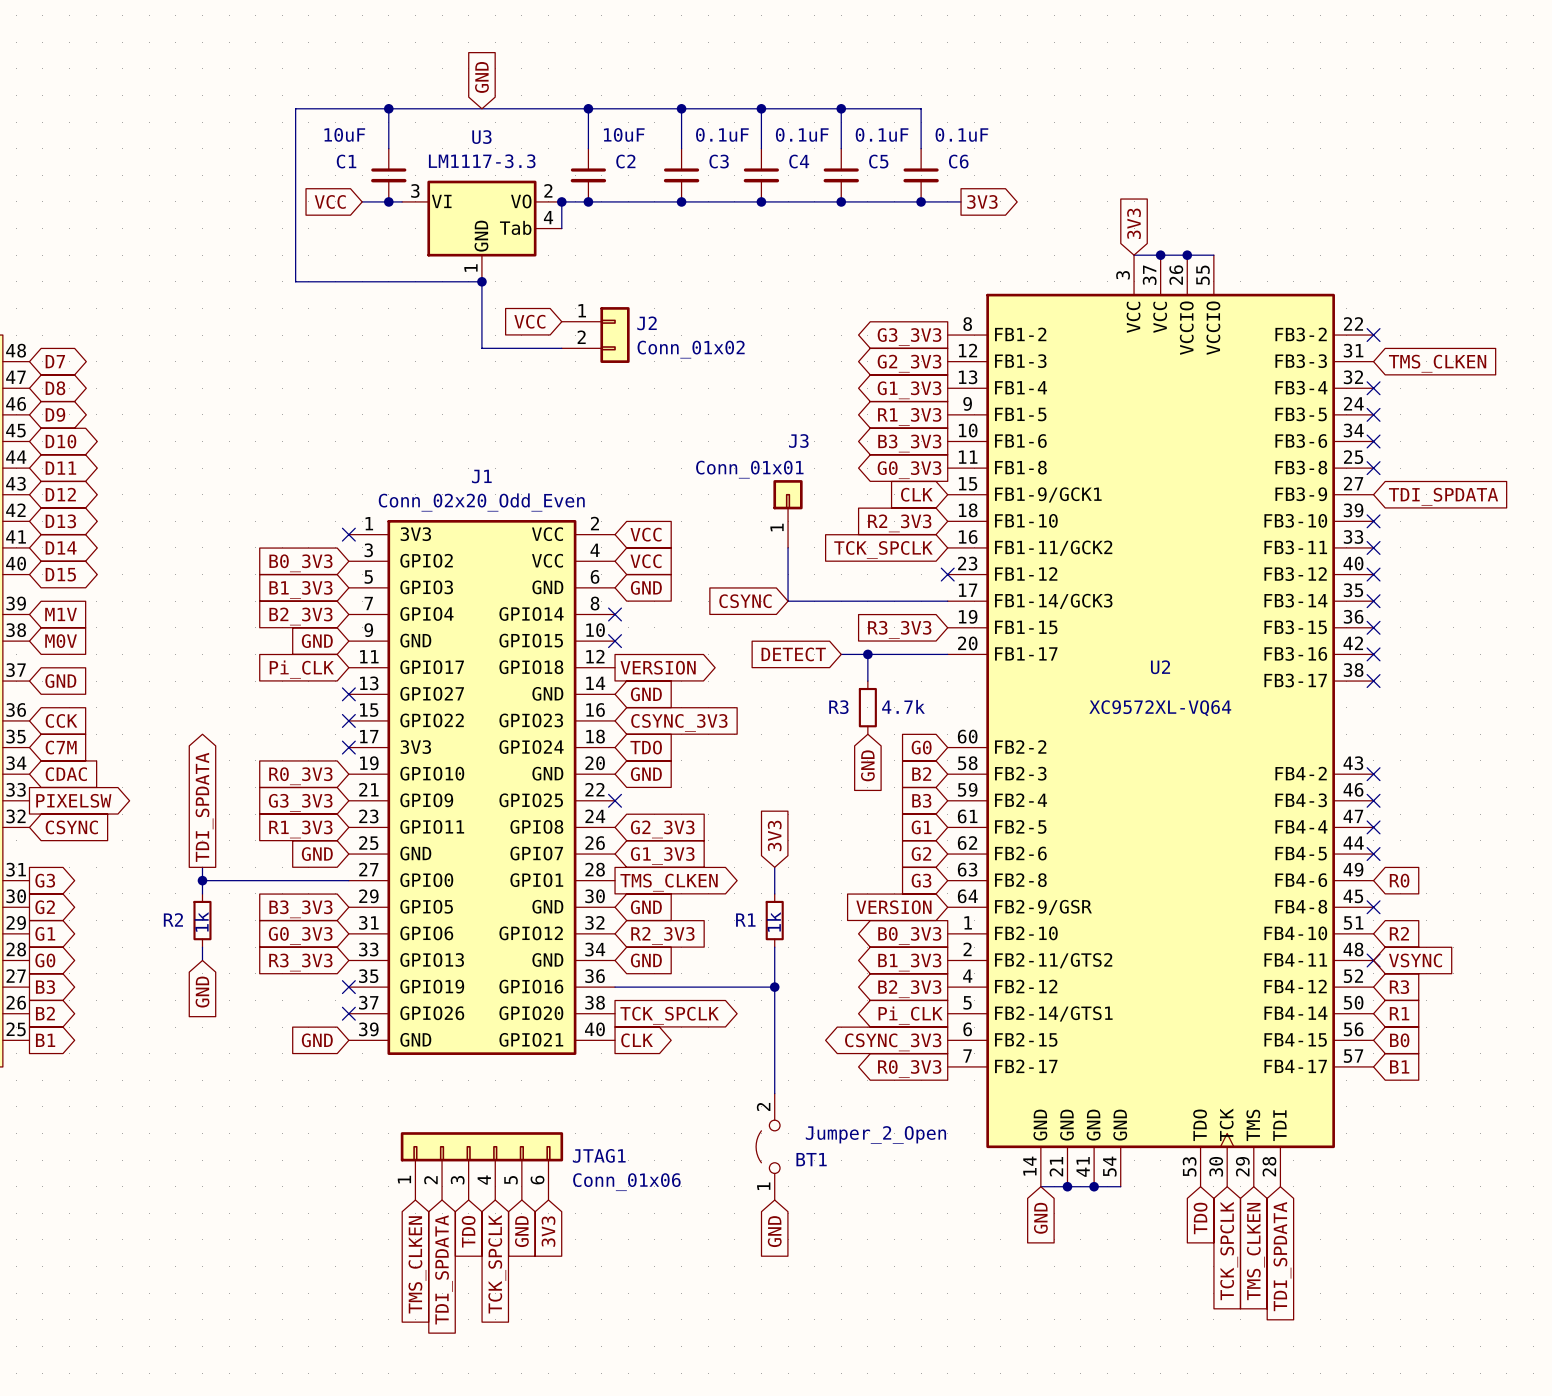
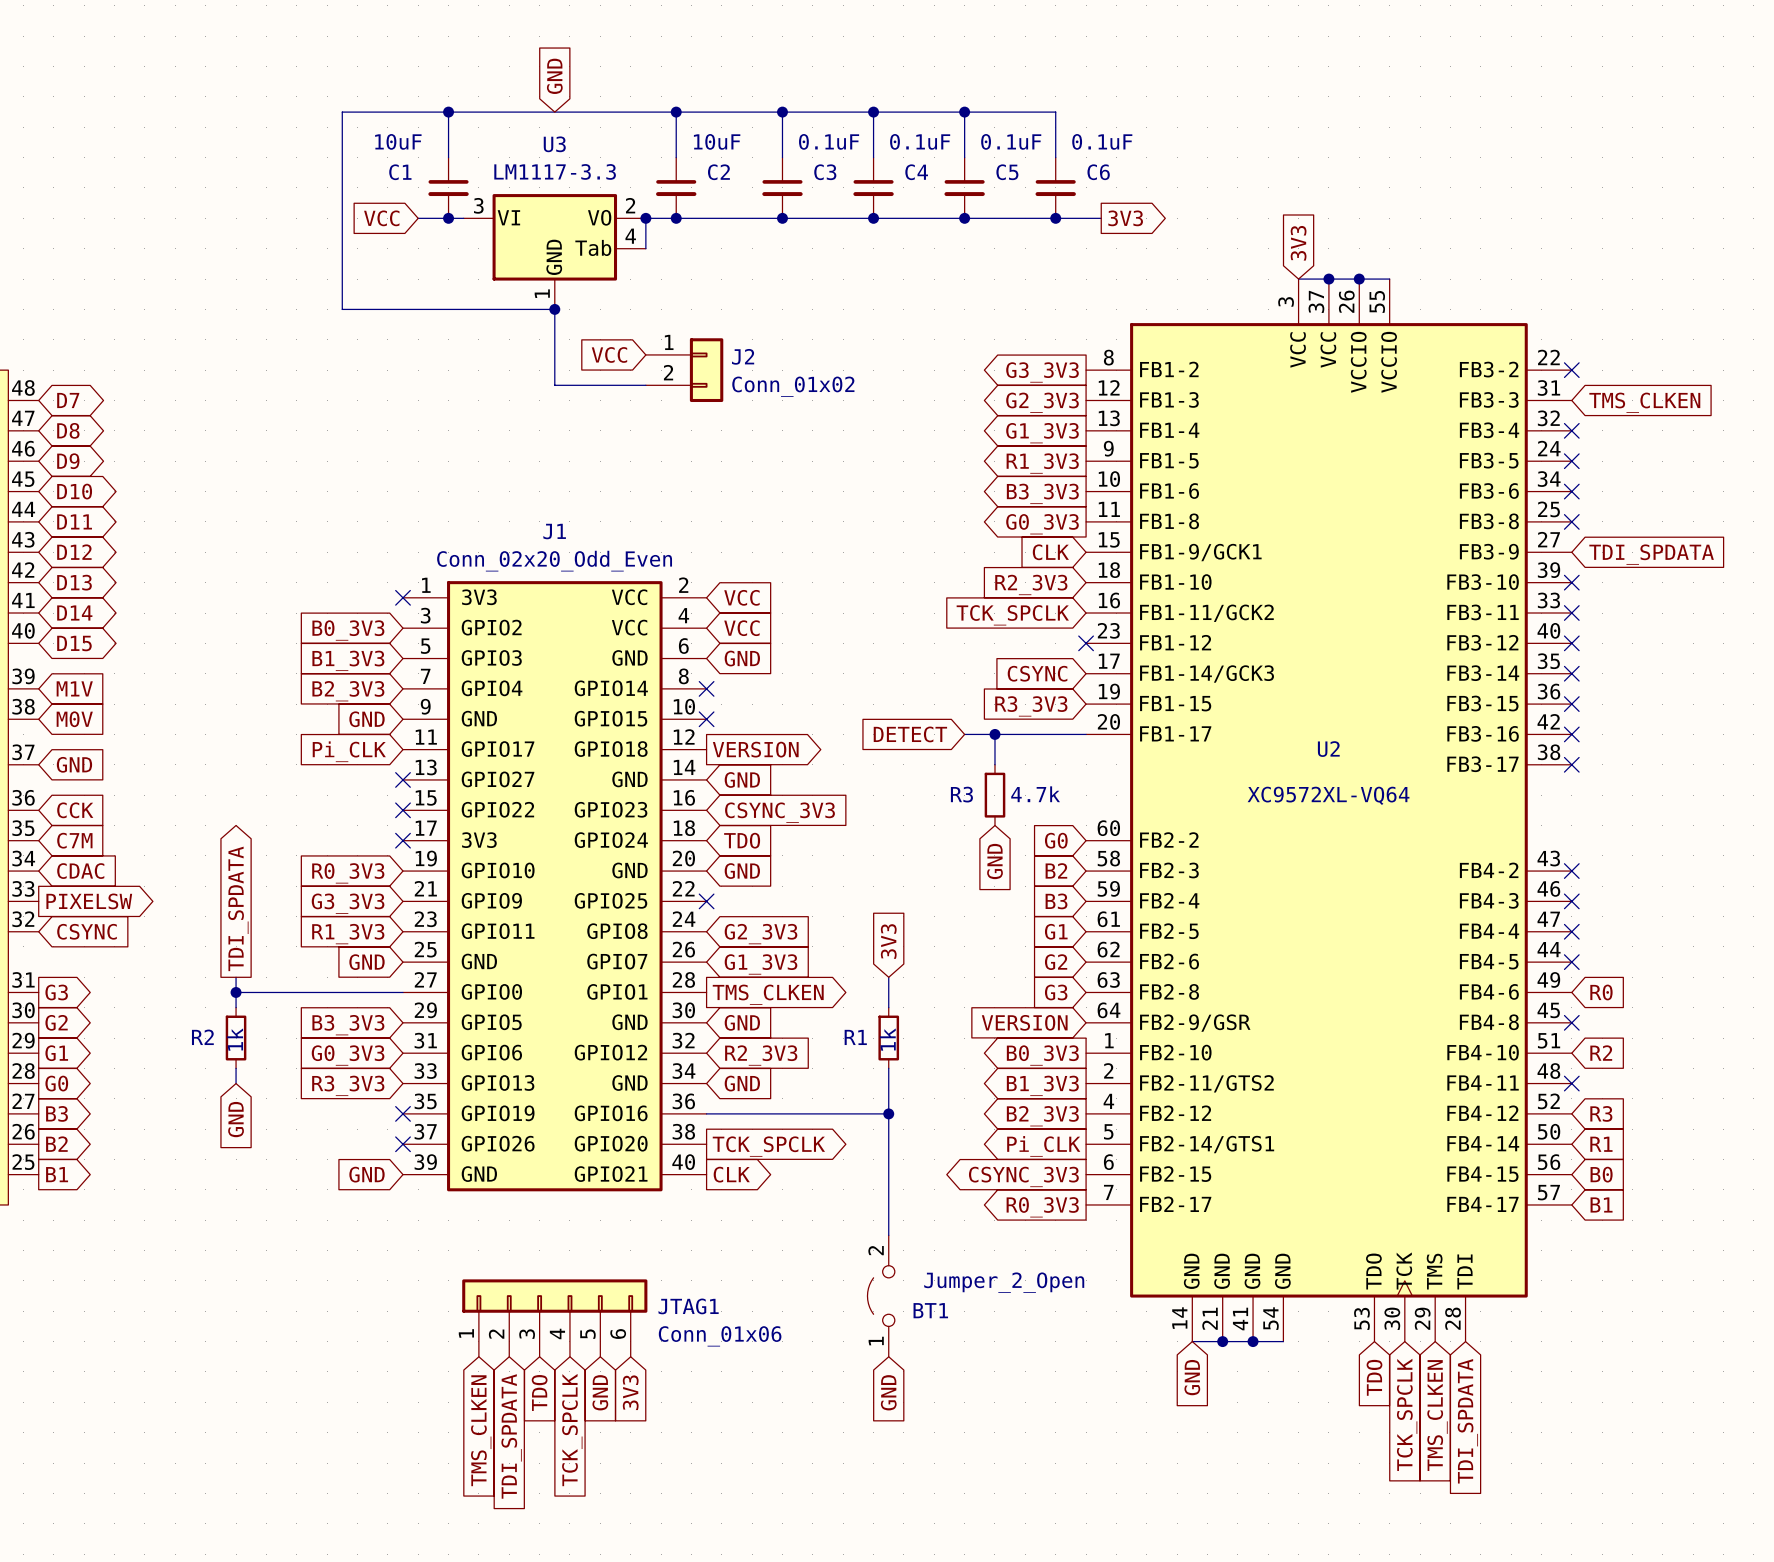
J3: Conn_01x01 (788, 514) -> none
wire: (788, 547) (788, 601) (947, 601) -> none
global label position: CSYNC (745, 601) -> CSYNC (1037, 673)
global label: VSYNC (1415, 960) -> none

